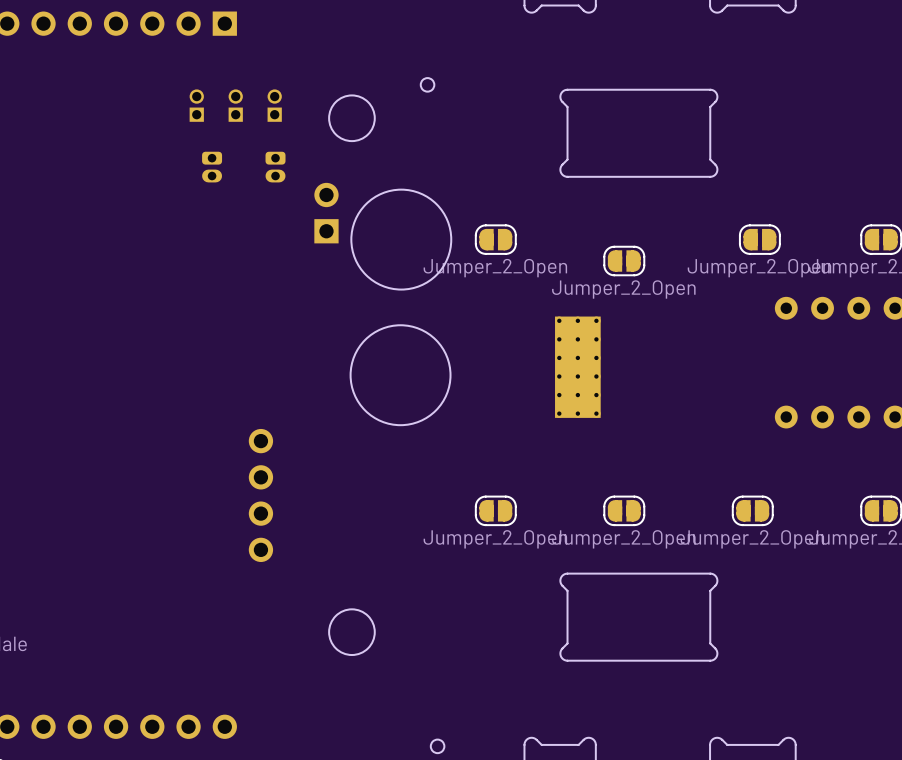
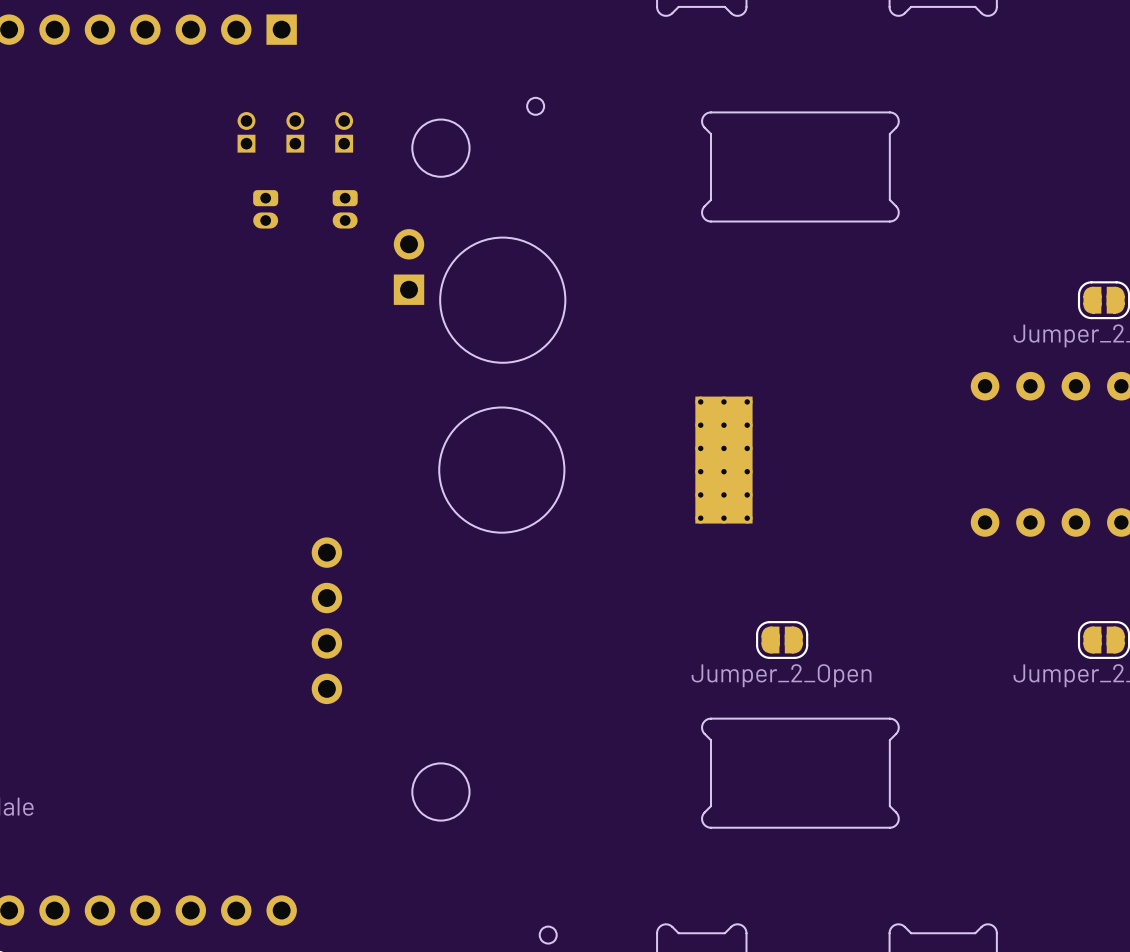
part: Jumper_2_Open (495, 239) -> none
part: Jumper_2_Open (759, 239) -> none
part: Jumper_2_Open (624, 261) -> none
part: Jumper_2_Open (495, 510) -> none
part: Jumper_2_Open (752, 510) -> none

